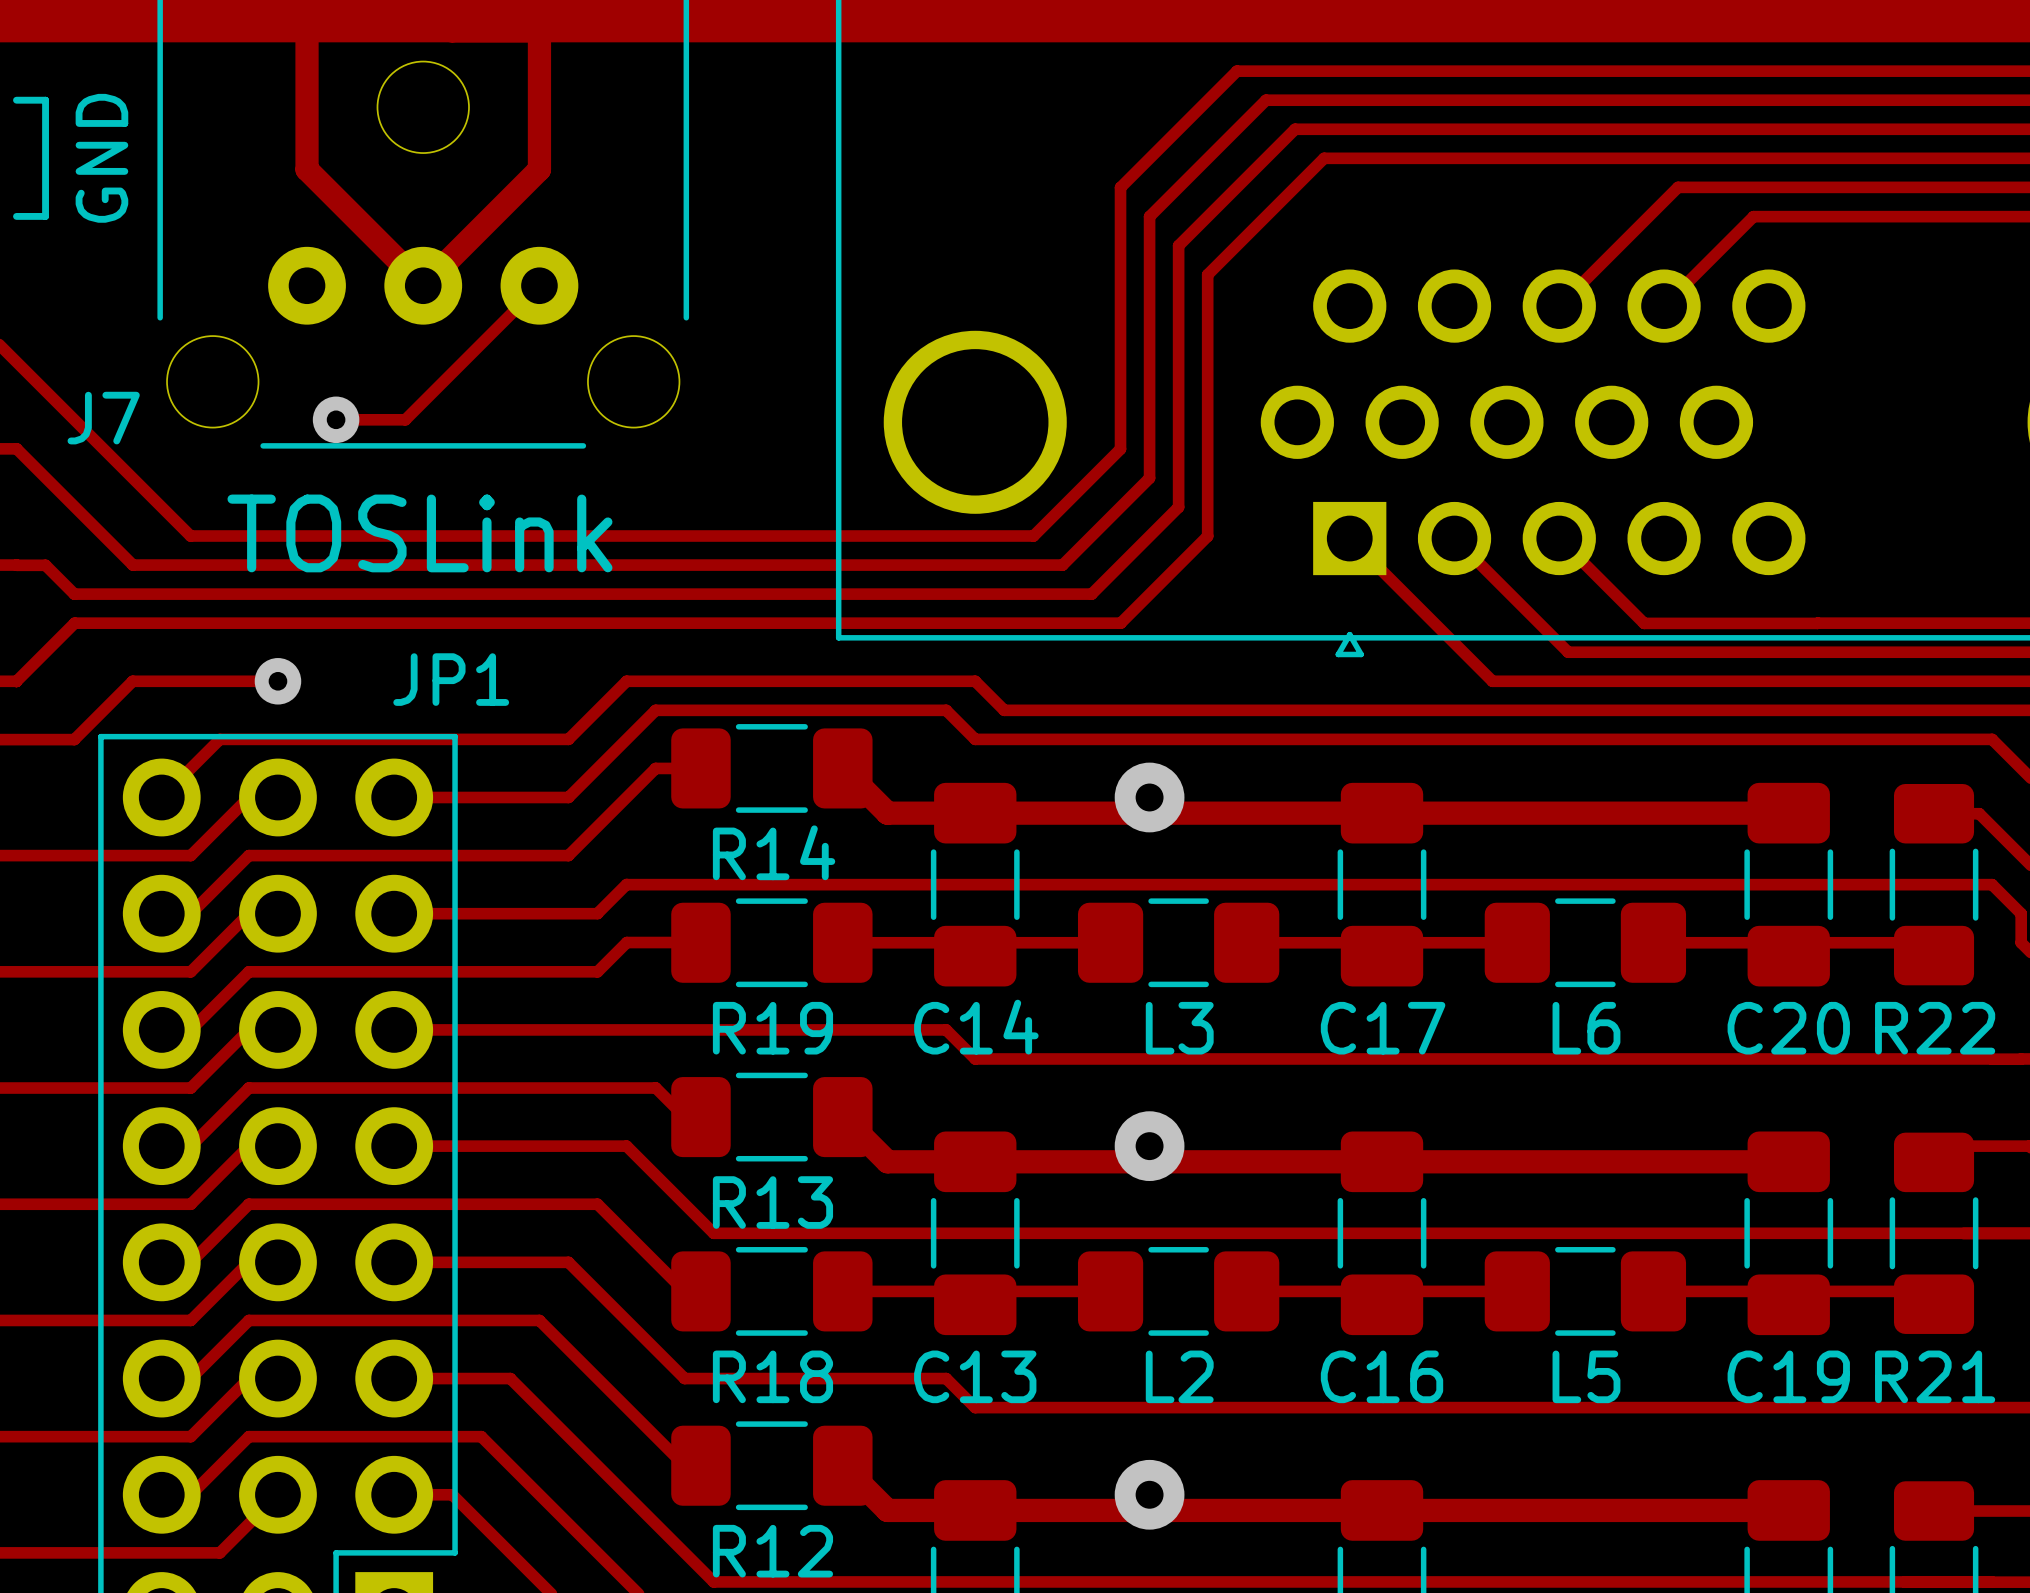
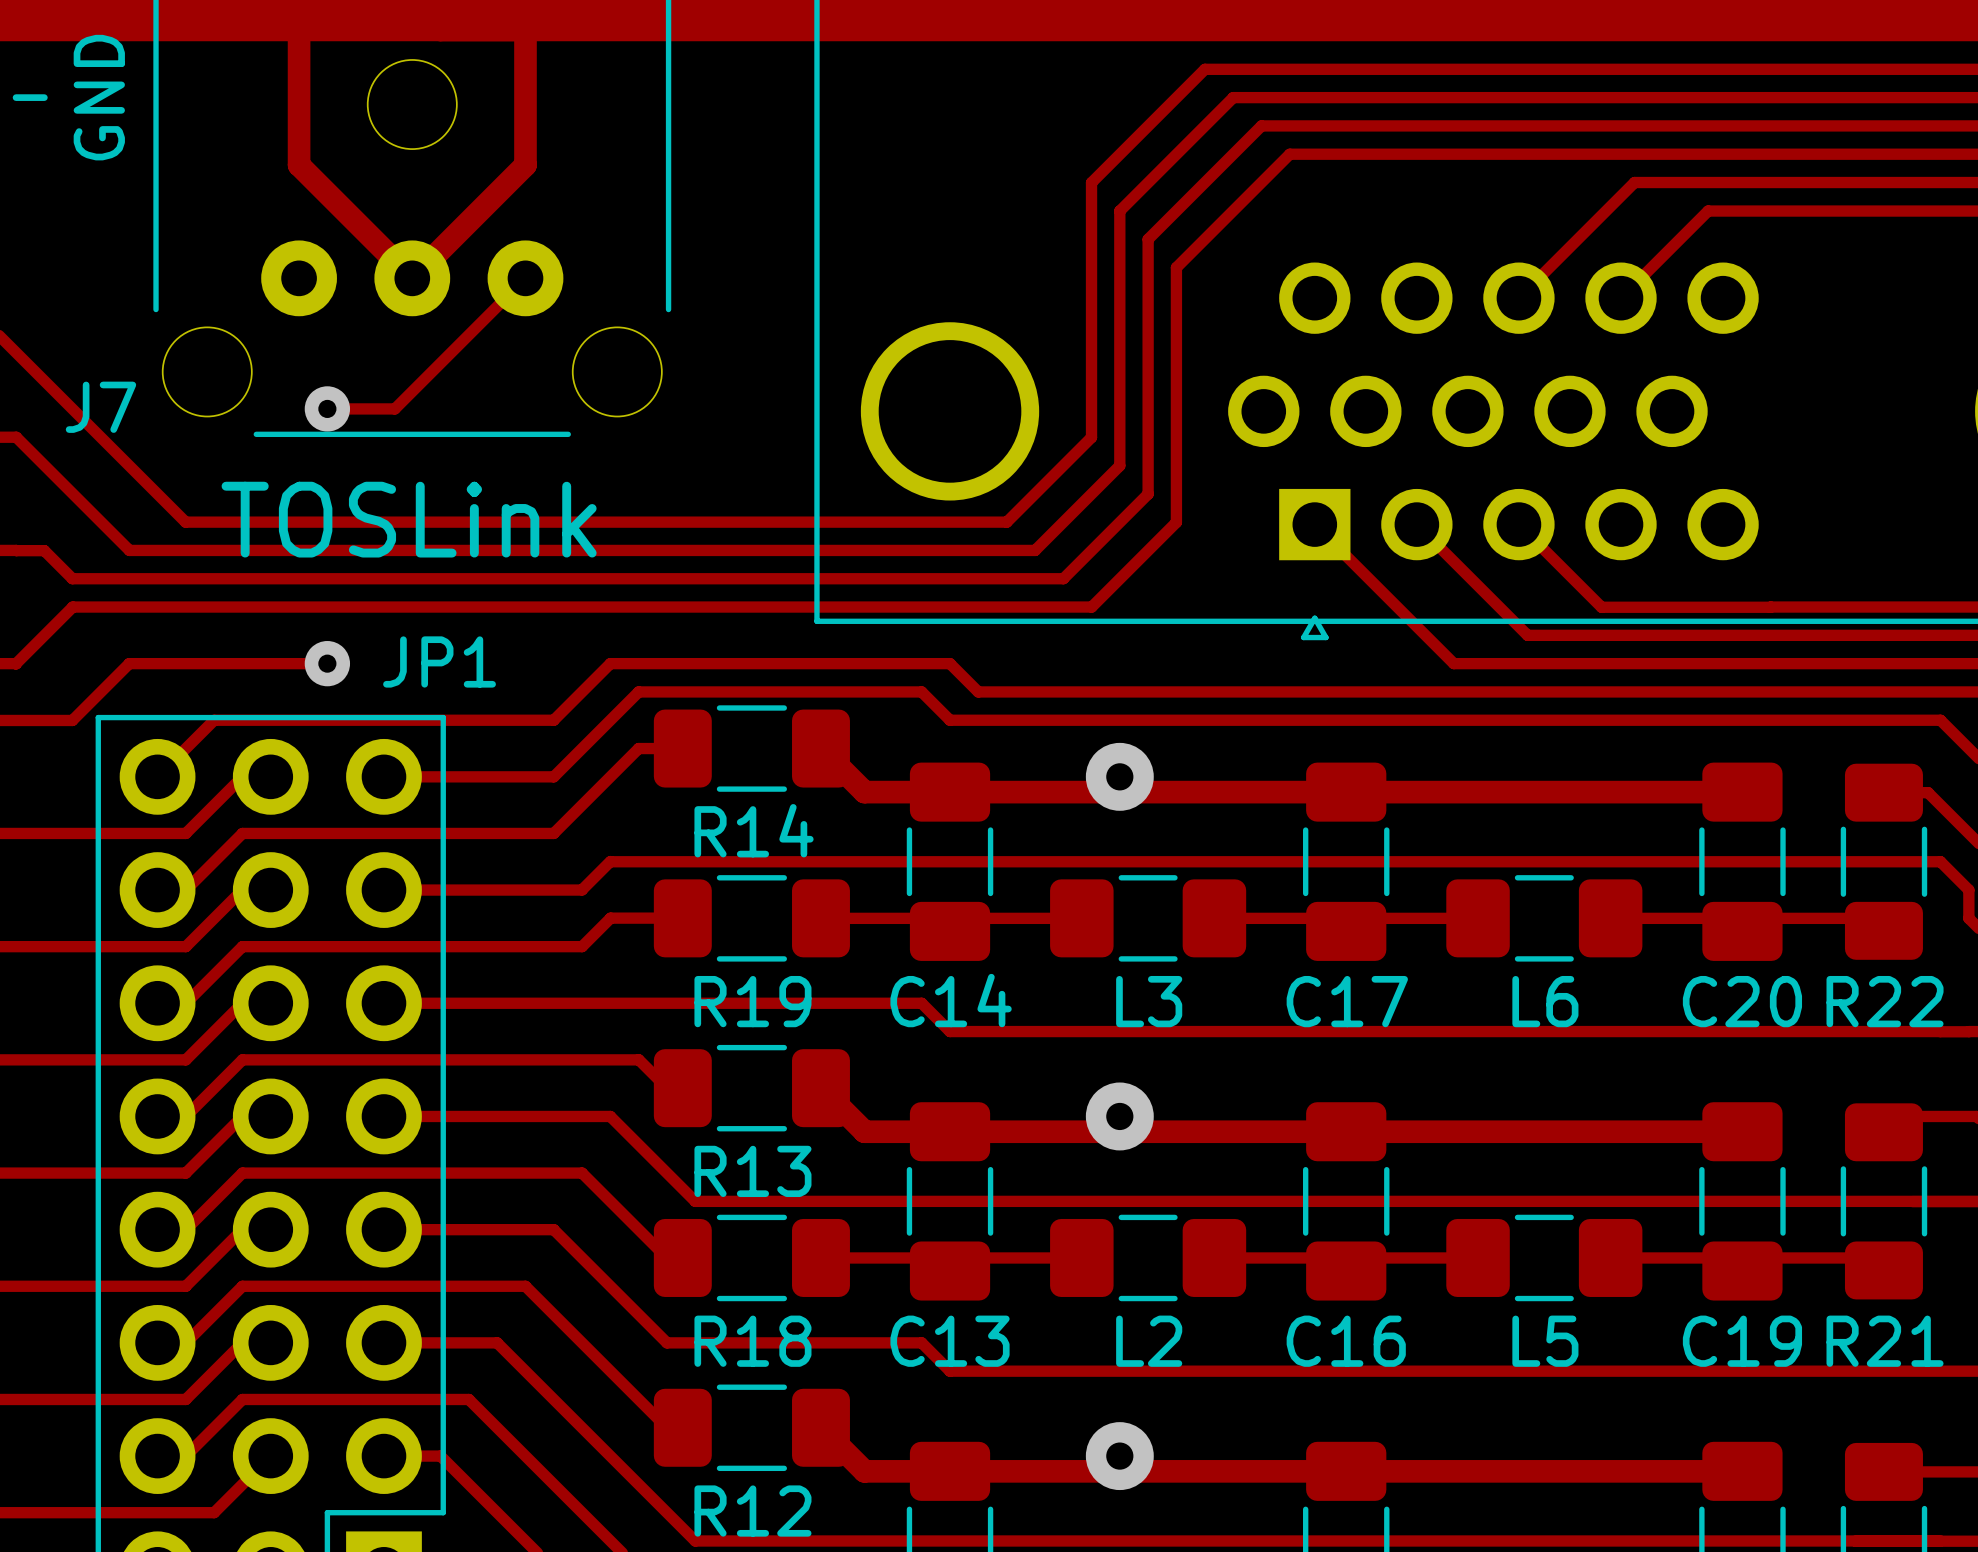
line: (45, 100) (45, 216) (16, 216) -> none
text position: GND (101, 158) -> GND (99, 97)
track: none -> (270, 663) (327, 663)
via position: (277, 681) -> (327, 663)

